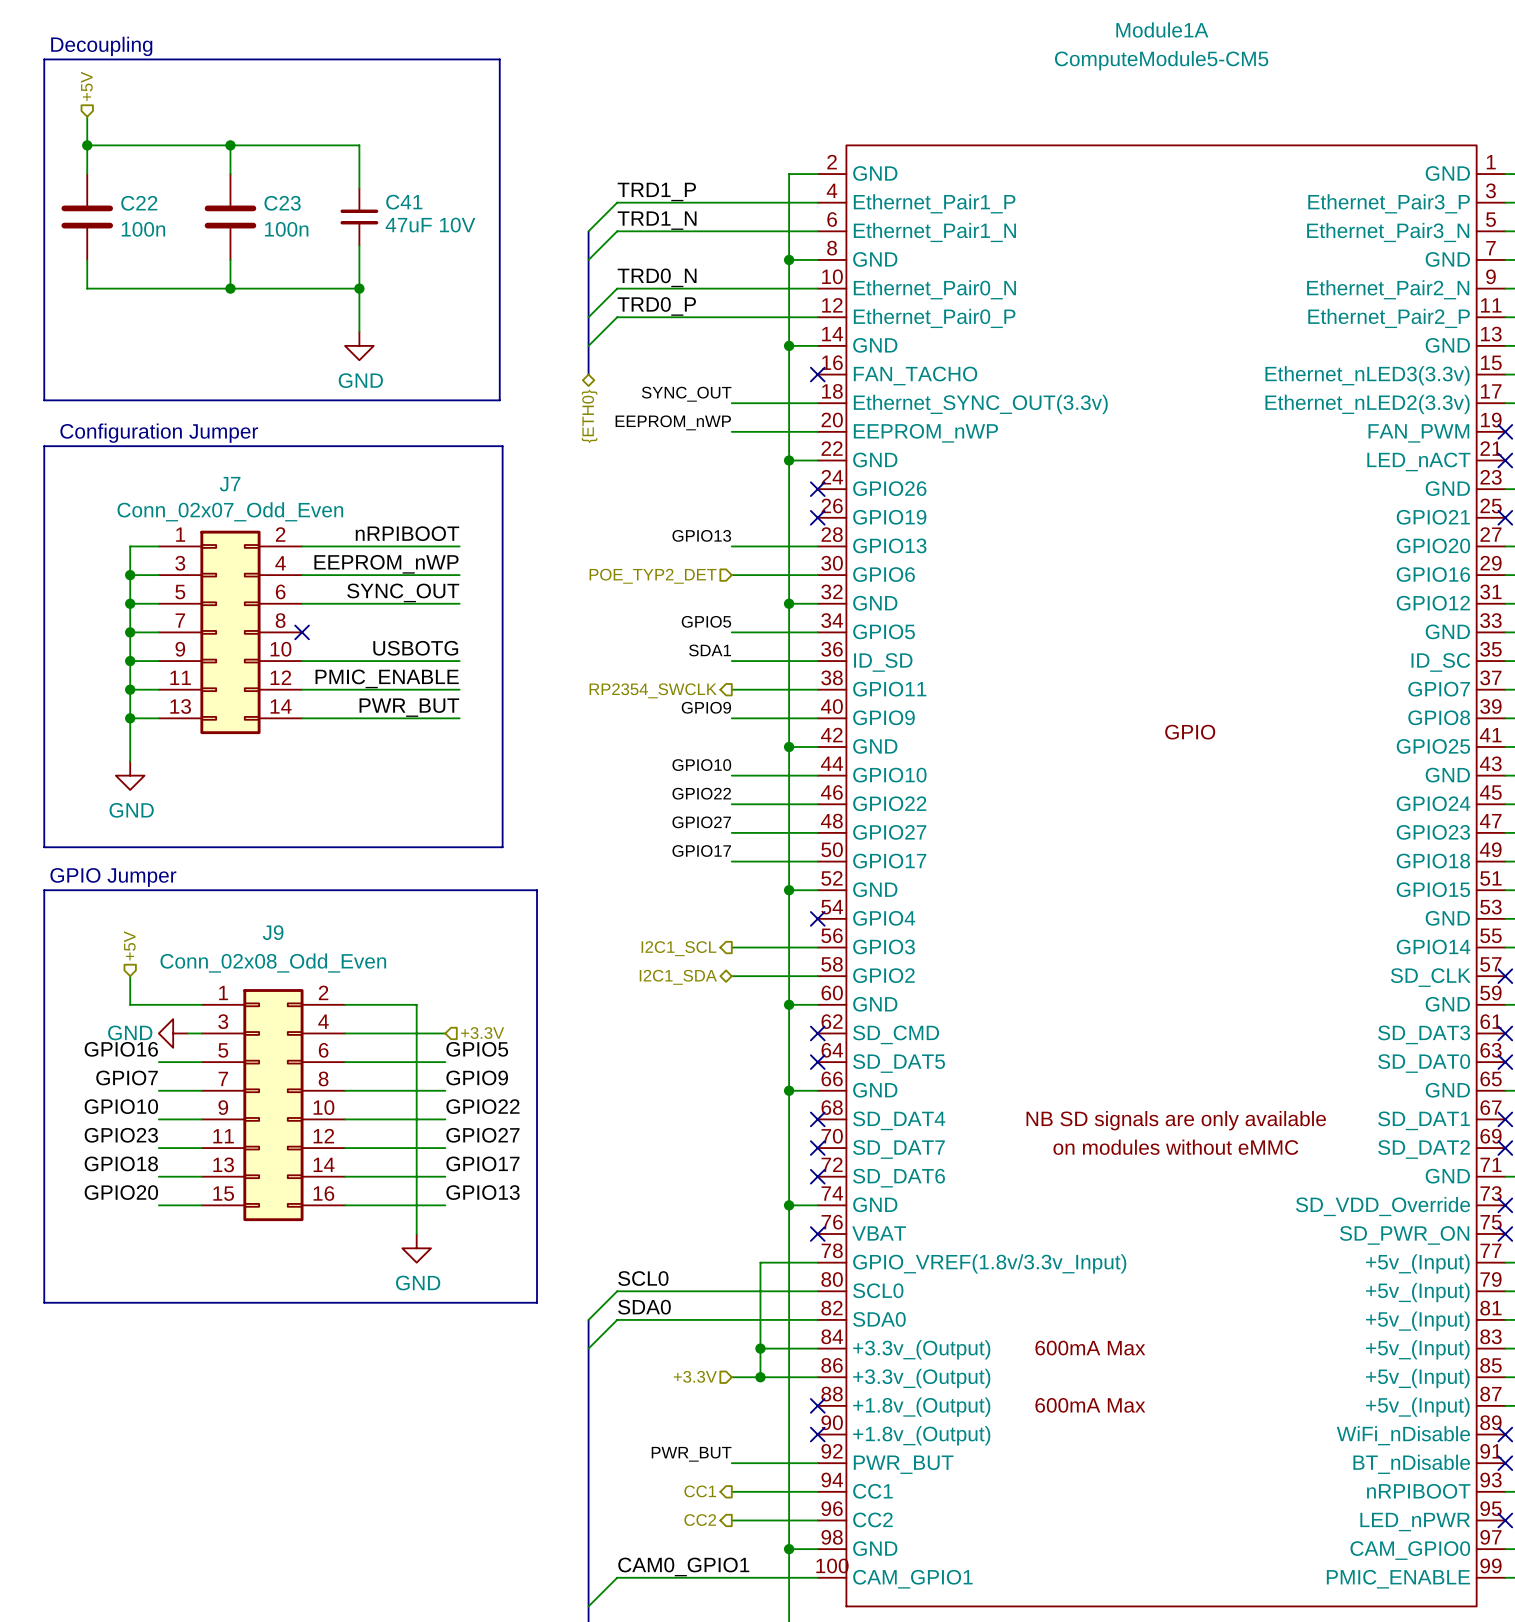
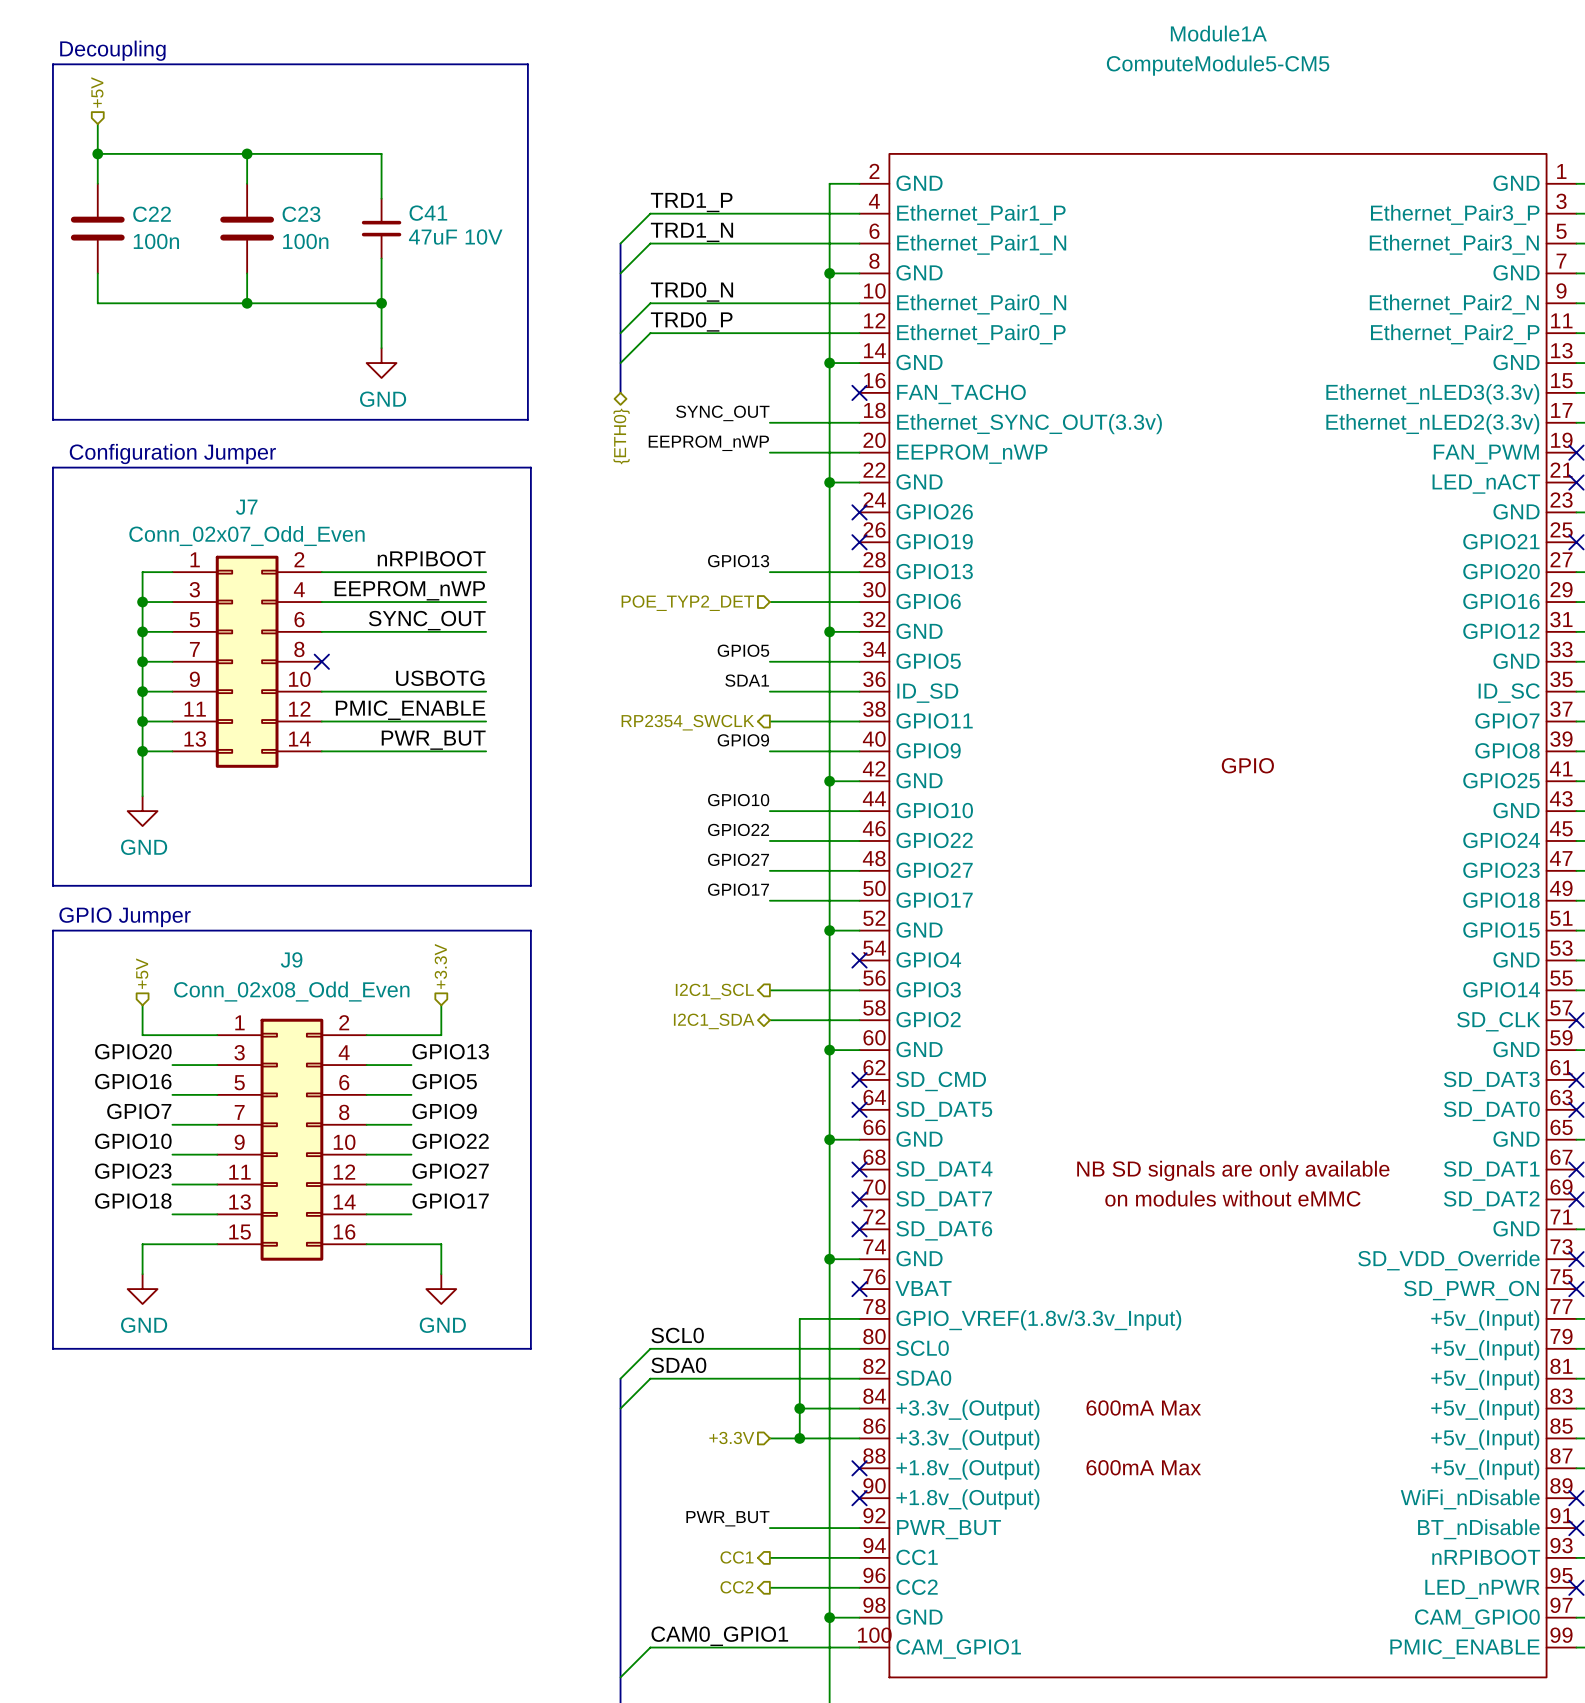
line: (502, 890) (537, 890) (537, 1302) (44, 1302) (44, 1291) -> (530, 930) (530, 1348) (52, 1348)
hierarchical label position: +5V (129, 945) -> +5V (142, 973)
wire: none -> (142, 1005) (142, 1020)
wire: none -> (441, 1005) (441, 1035) (366, 1035)
wire: (130, 990) (130, 1004) (201, 1004) -> (142, 1035) (217, 1035)
wire: (345, 1004) (416, 1004) (416, 1191) -> (366, 1244) (441, 1244)
wire: none -> (366, 1065) (411, 1065)
power symbol: GND (173, 1033) -> none
wire: (187, 1033) (201, 1033) -> none
wire: (345, 1033) (445, 1033) -> none
hierarchical label rotation: 0° (482, 1033) -> 90° counterclockwise (440, 966)
hierarchical label position: +3.3V (482, 1033) -> +3.3V (440, 966)
wire: none -> (366, 1094) (411, 1094)
label position: GPIO16 (121, 1049) -> GPIO16 (133, 1081)
label position: GPIO5 (477, 1049) -> GPIO5 (444, 1081)
wire: (158, 1062) (201, 1062) -> (172, 1065) (217, 1065)
wire: (345, 1062) (445, 1062) -> none
wire: none -> (366, 1124) (411, 1124)
label position: GPIO7 (127, 1077) -> GPIO7 (139, 1111)
label position: GPIO9 (477, 1077) -> GPIO9 (444, 1111)
wire: (158, 1090) (201, 1090) -> (172, 1094) (217, 1094)
wire: (345, 1090) (445, 1090) -> none
J9 position: (273, 1105) -> (291, 1139)
wire: none -> (366, 1154) (411, 1154)
label position: GPIO10 (121, 1106) -> GPIO10 (133, 1141)
label position: GPIO22 (482, 1106) -> GPIO22 (450, 1141)
wire: (158, 1119) (201, 1119) -> (172, 1124) (217, 1124)
wire: (345, 1119) (445, 1119) -> none
wire: none -> (366, 1184) (411, 1184)
label position: GPIO23 (121, 1135) -> GPIO23 (133, 1171)
label position: GPIO27 (482, 1135) -> GPIO27 (450, 1171)
wire: (158, 1148) (201, 1148) -> (172, 1154) (217, 1154)
wire: (345, 1148) (445, 1148) -> none
wire: none -> (366, 1214) (411, 1214)
label position: GPIO18 (121, 1163) -> GPIO18 (133, 1201)
label position: GPIO17 (482, 1163) -> GPIO17 (450, 1201)
wire: (158, 1176) (201, 1176) -> (172, 1184) (217, 1184)
wire: (345, 1176) (445, 1176) -> none
wire: none -> (217, 1244) (142, 1244) (142, 1274)
label position: GPIO20 (121, 1192) -> GPIO20 (133, 1051)
label position: GPIO13 (483, 1192) -> GPIO13 (450, 1051)
wire: (158, 1205) (201, 1205) -> (172, 1214) (217, 1214)
wire: (345, 1205) (445, 1205) -> none
power symbol: none -> GND (142, 1289)
power symbol position: GND (416, 1248) -> GND (441, 1289)

